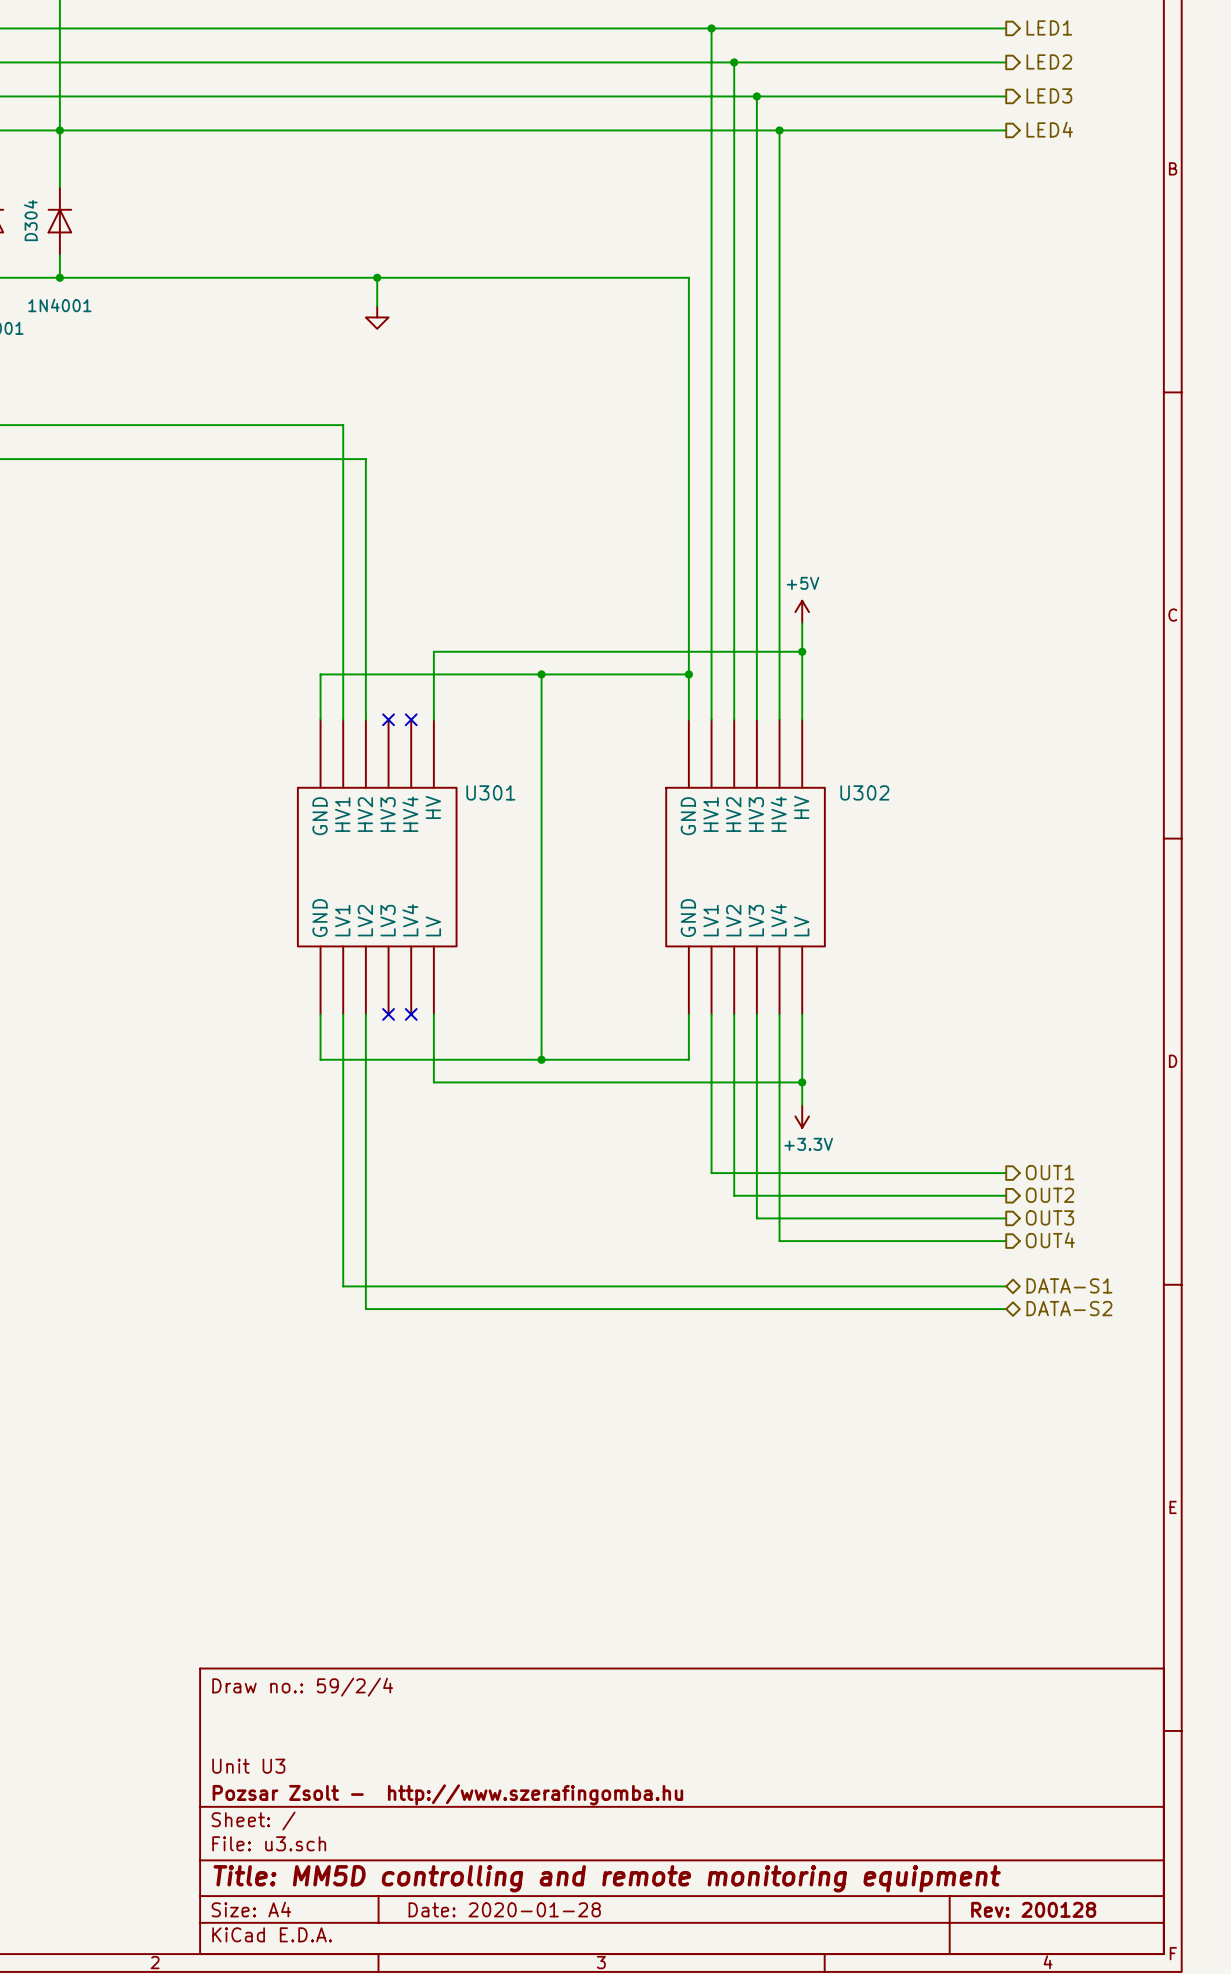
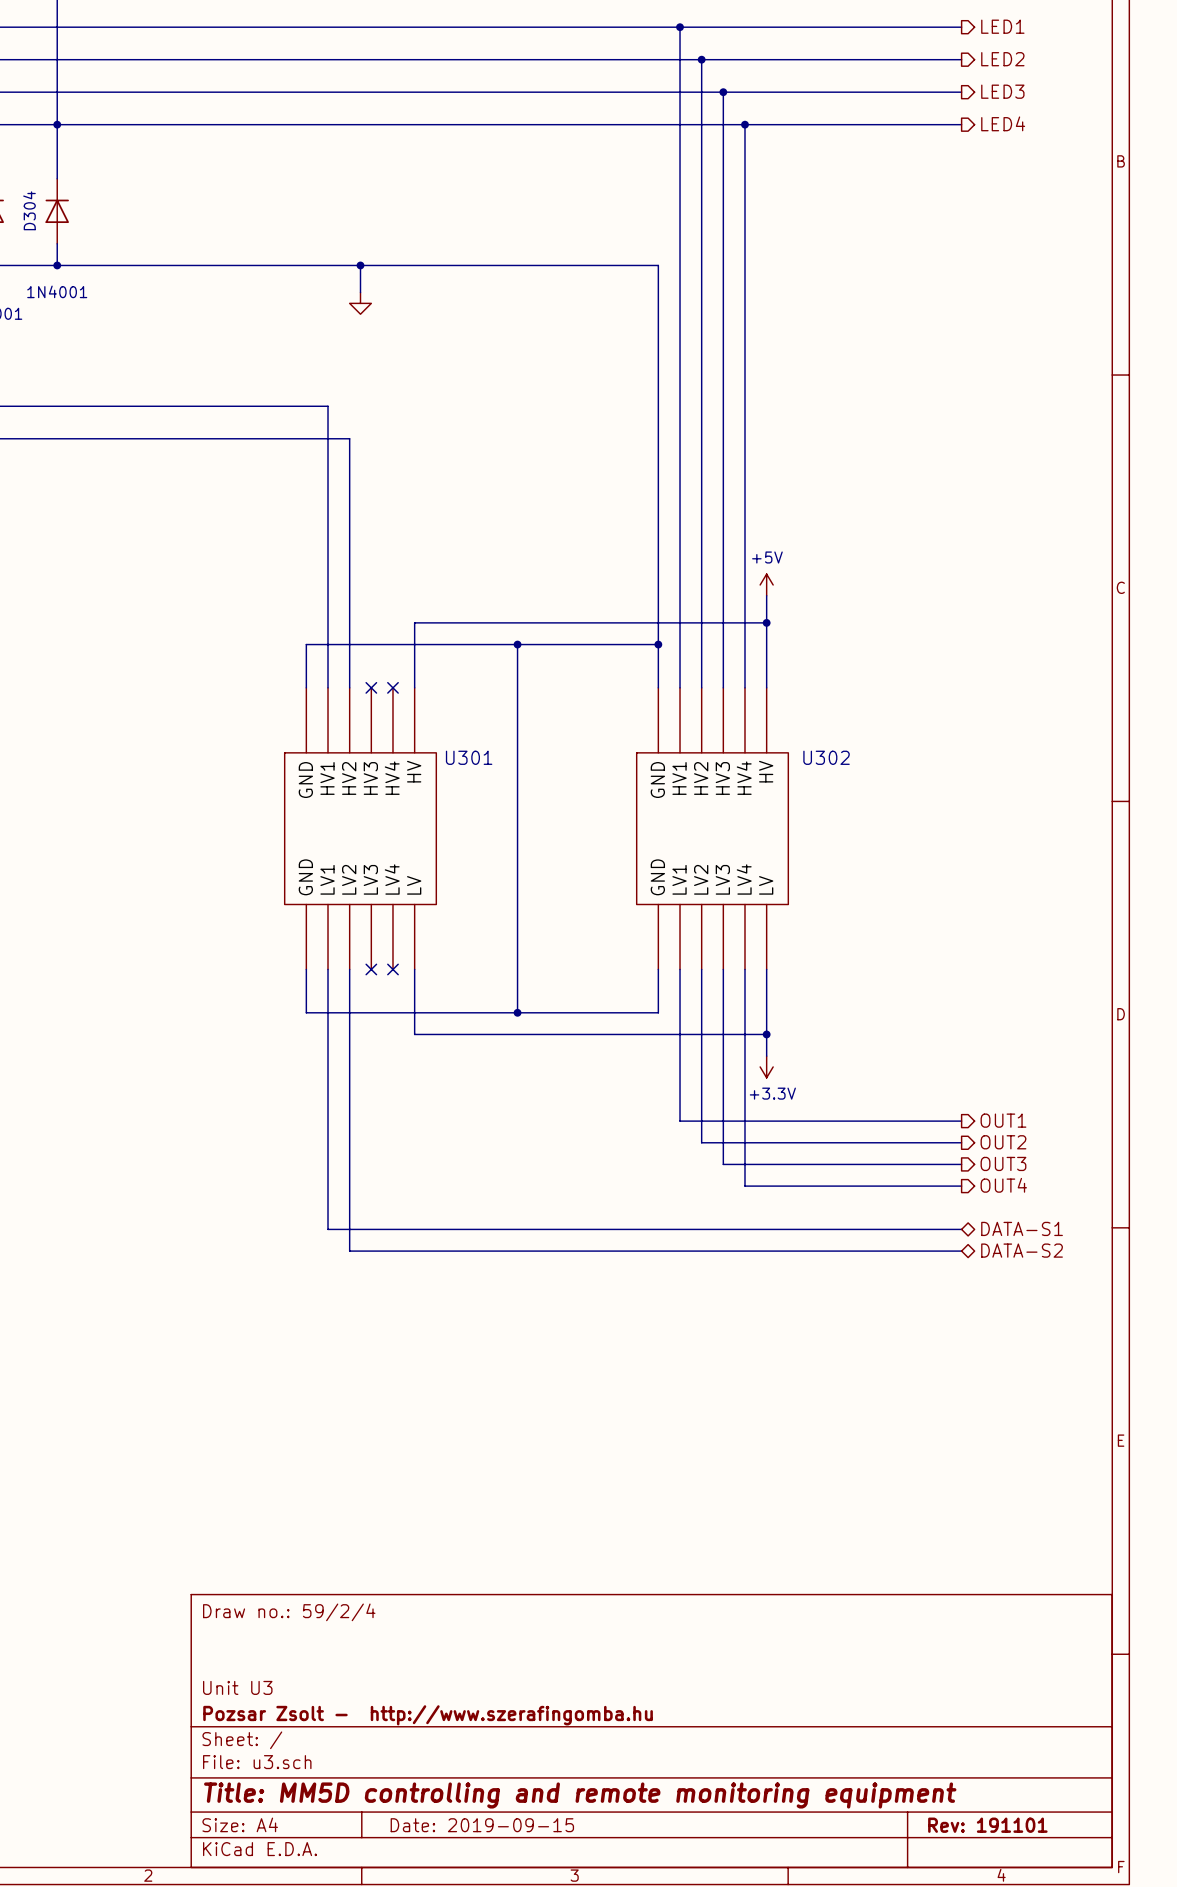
title block: Date: 2020-01-28 (504, 1909) -> Date: 2019-09-15 (482, 1825)
title block: Rev: 200128 (1033, 1909) -> Rev: 191101 (987, 1825)

